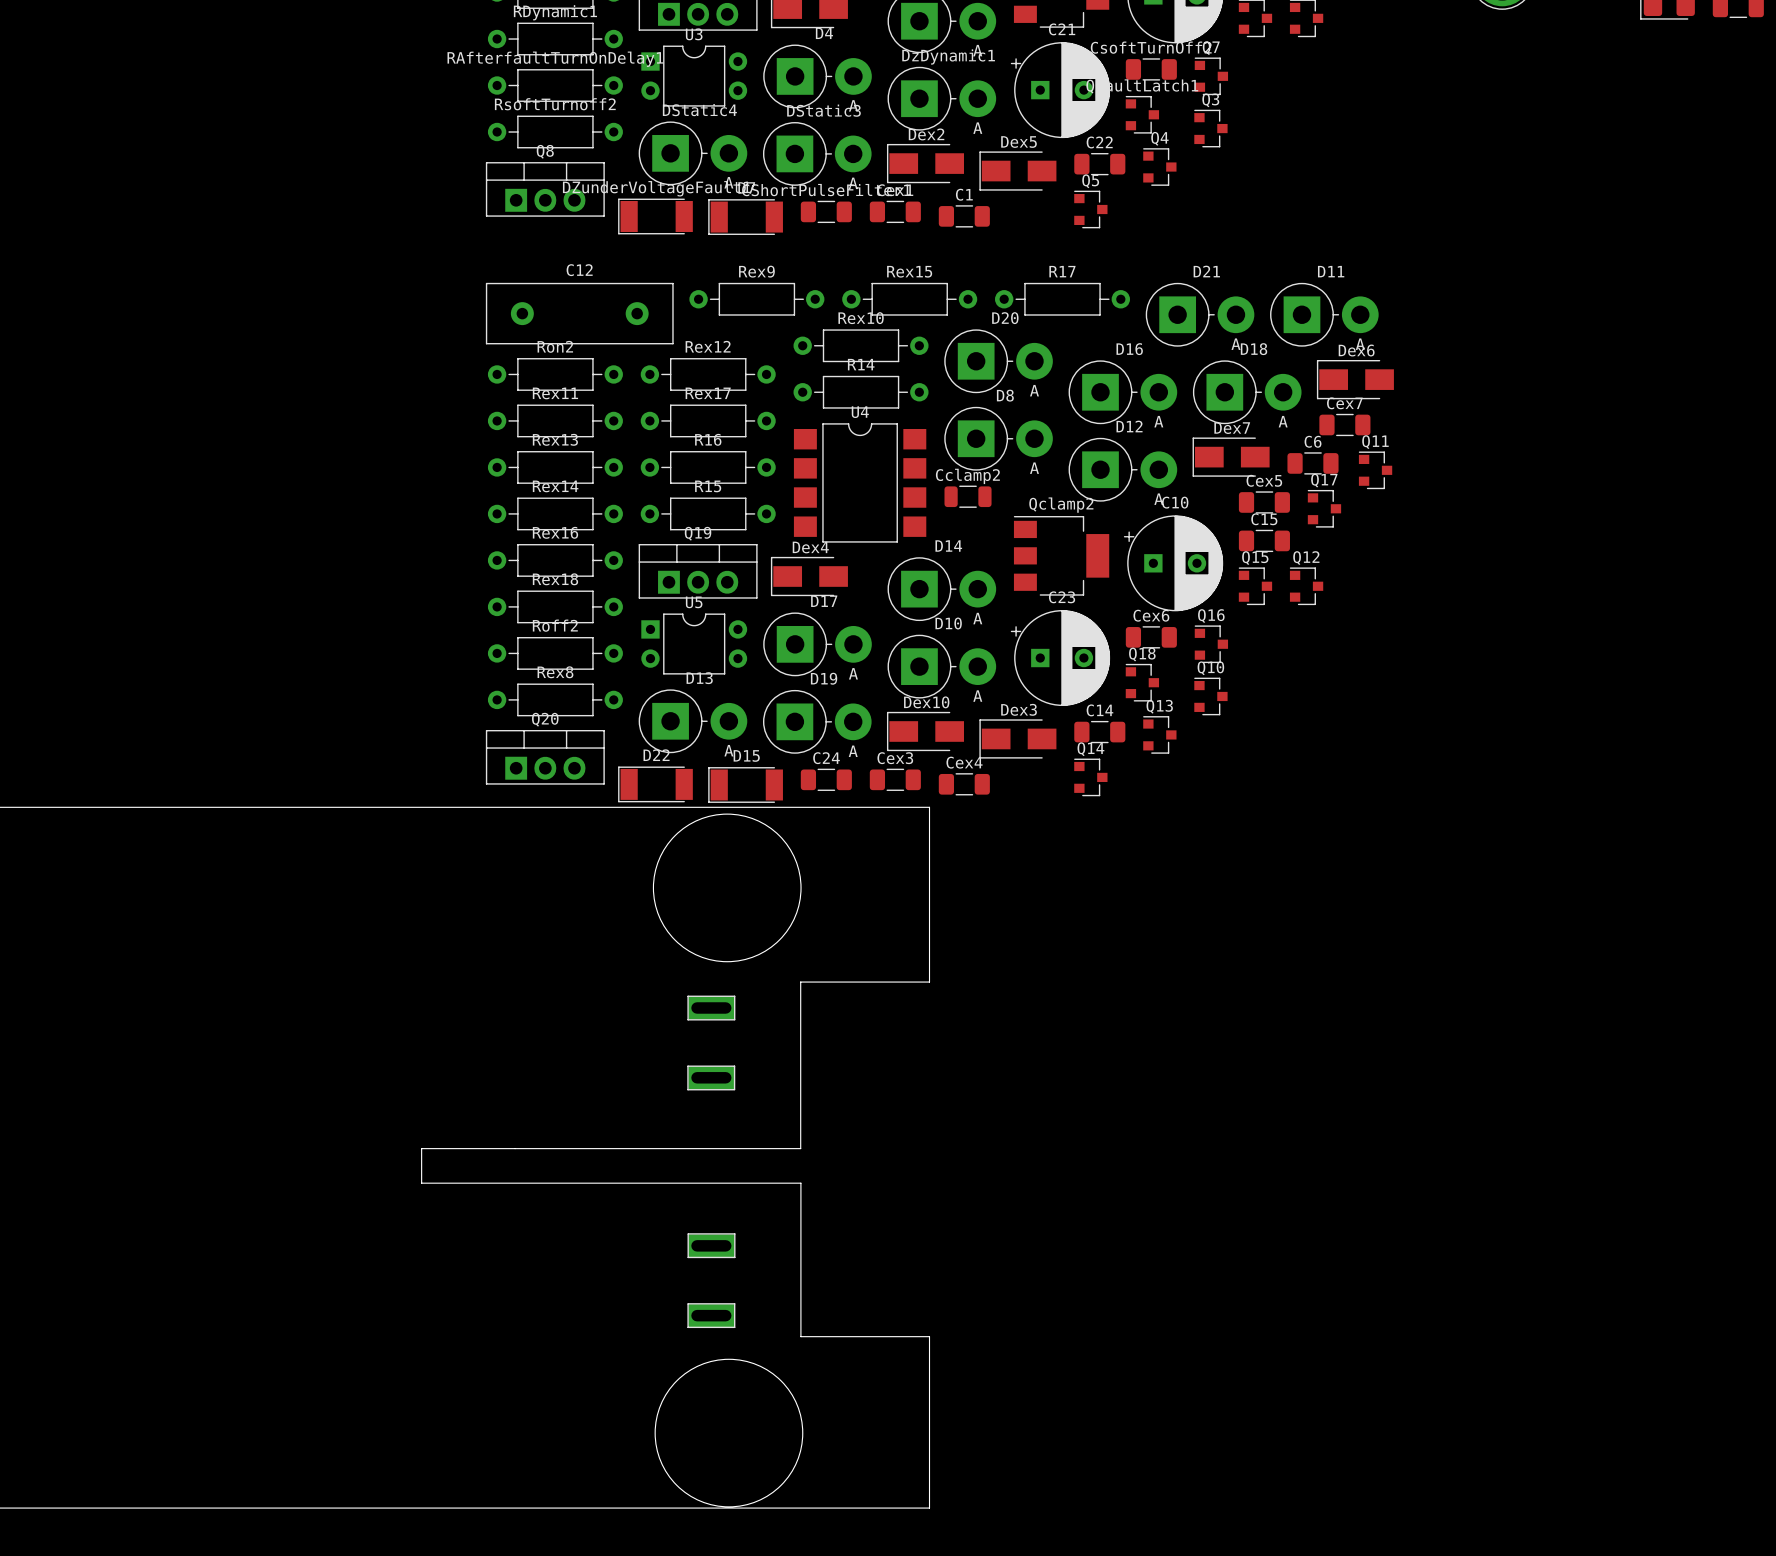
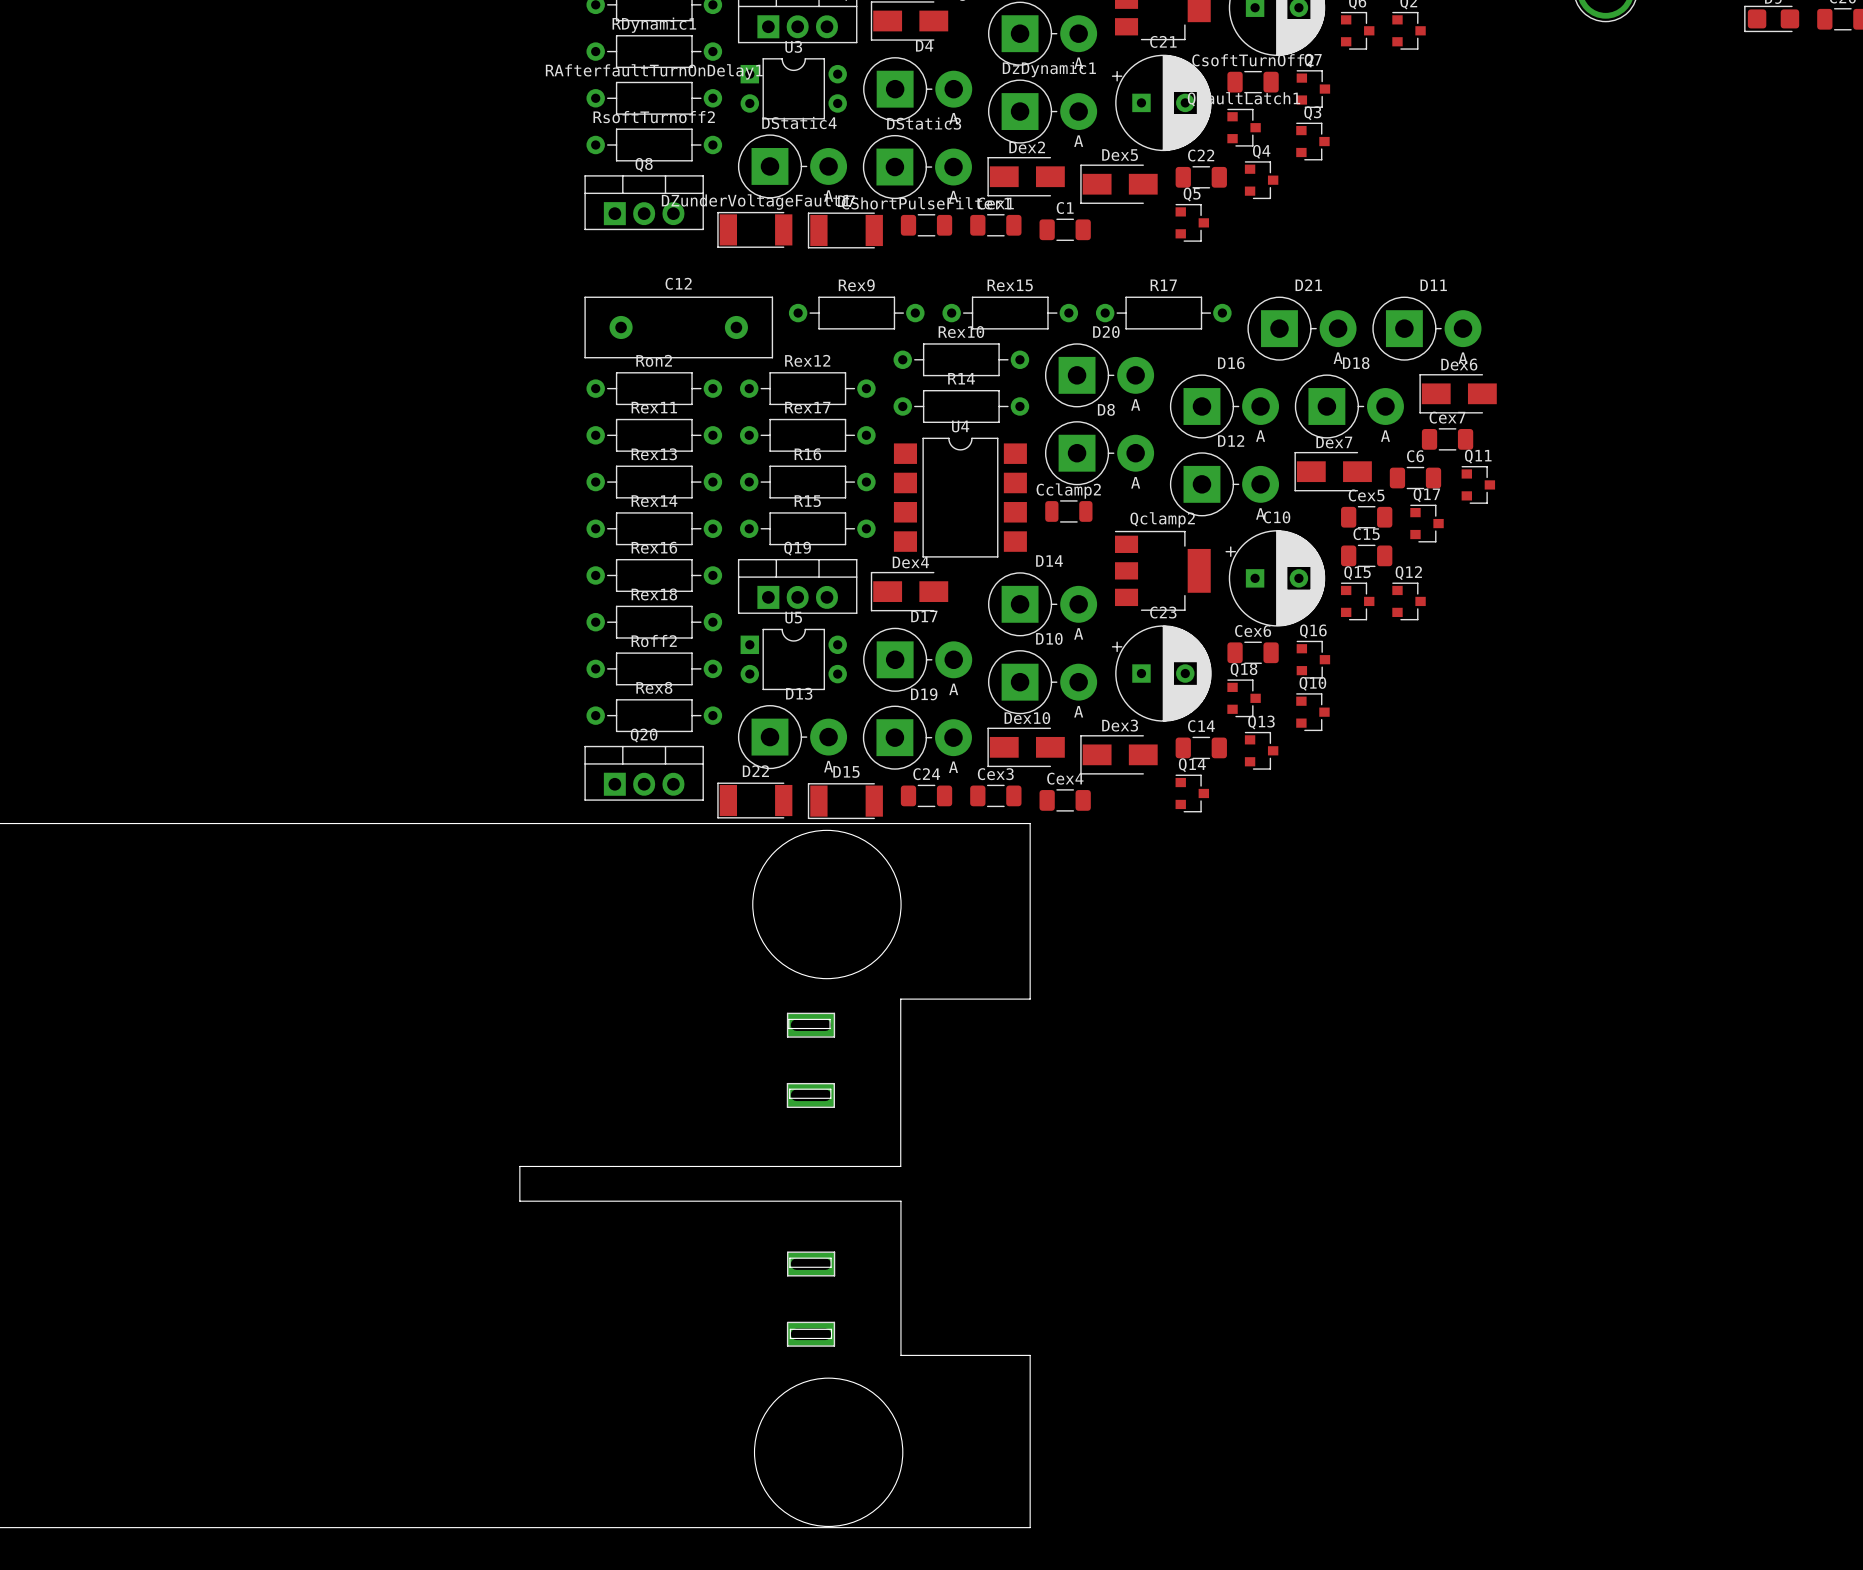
board edge: none -> (788, 1019) (830, 1019) (830, 1028) (788, 1028) (788, 1019)
board edge: none -> (789, 1089) (830, 1089) (830, 1098) (789, 1098) (789, 1089)
board edge: none -> (789, 1258) (831, 1258) (831, 1267) (789, 1267) (789, 1258)
board edge: none -> (790, 1329) (831, 1329) (831, 1338) (790, 1338) (790, 1329)

